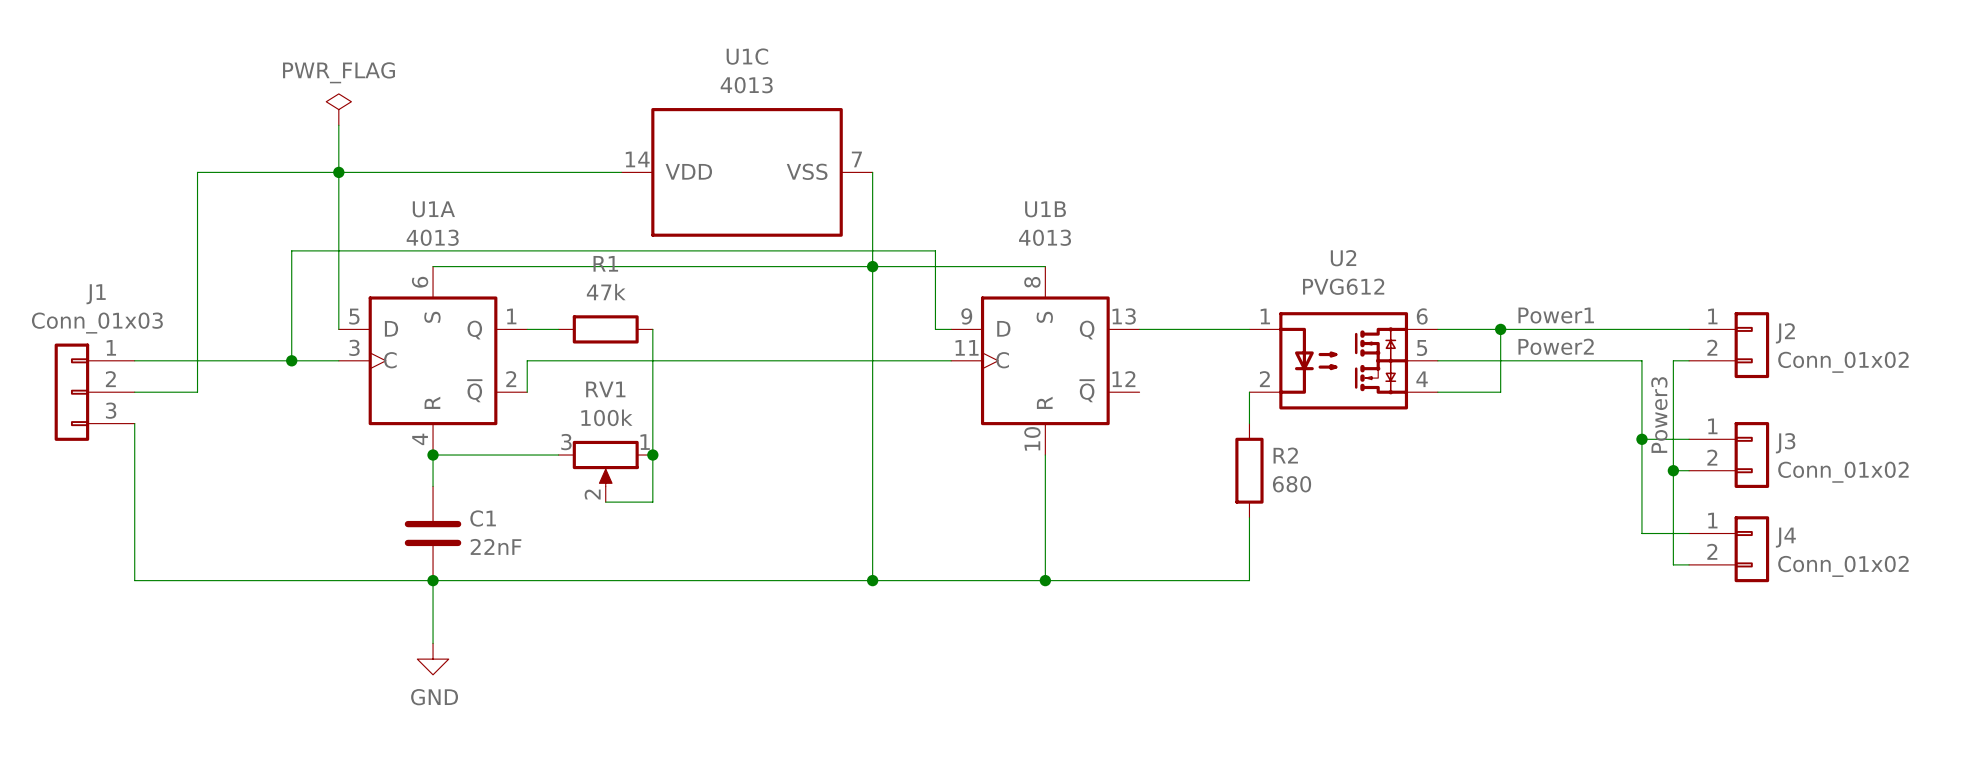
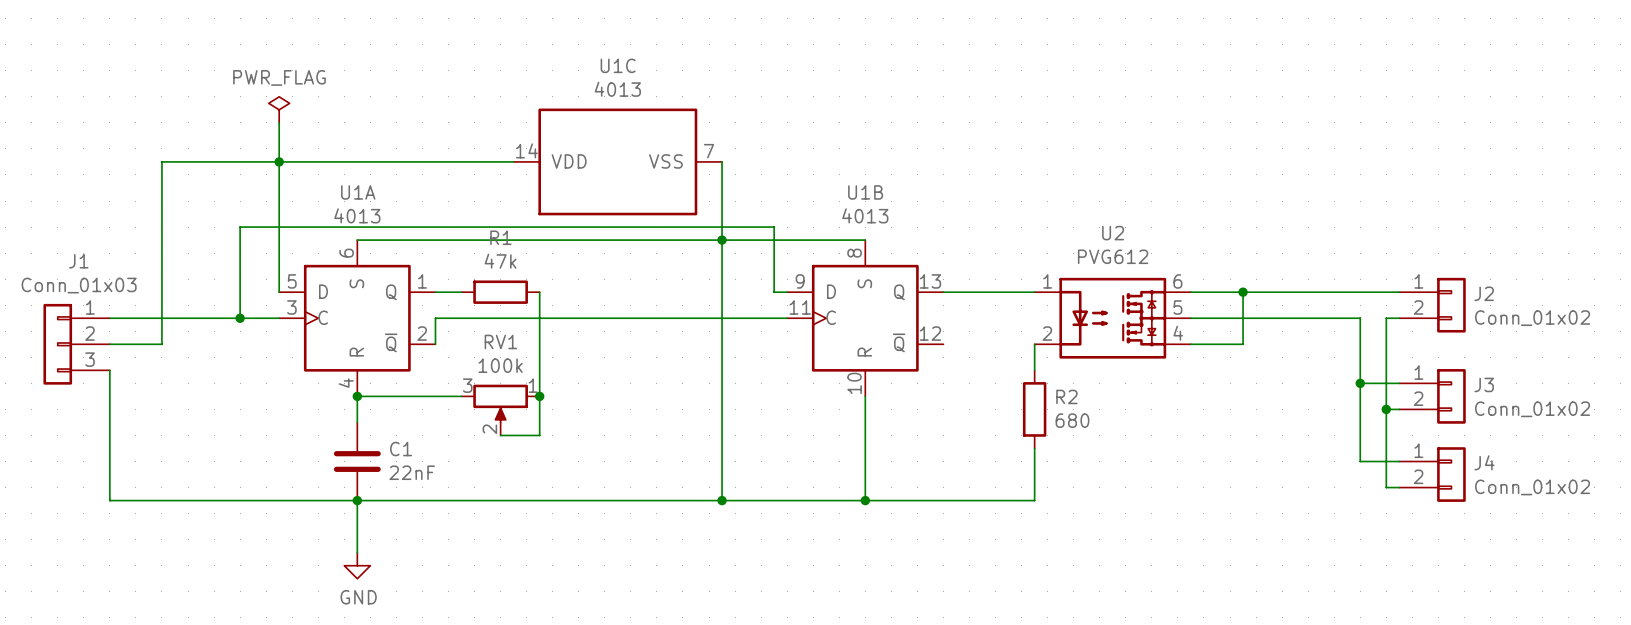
label: Power1 (1556, 315) -> none
label: Power2 (1556, 346) -> none
label: Power3 (1659, 415) -> none

